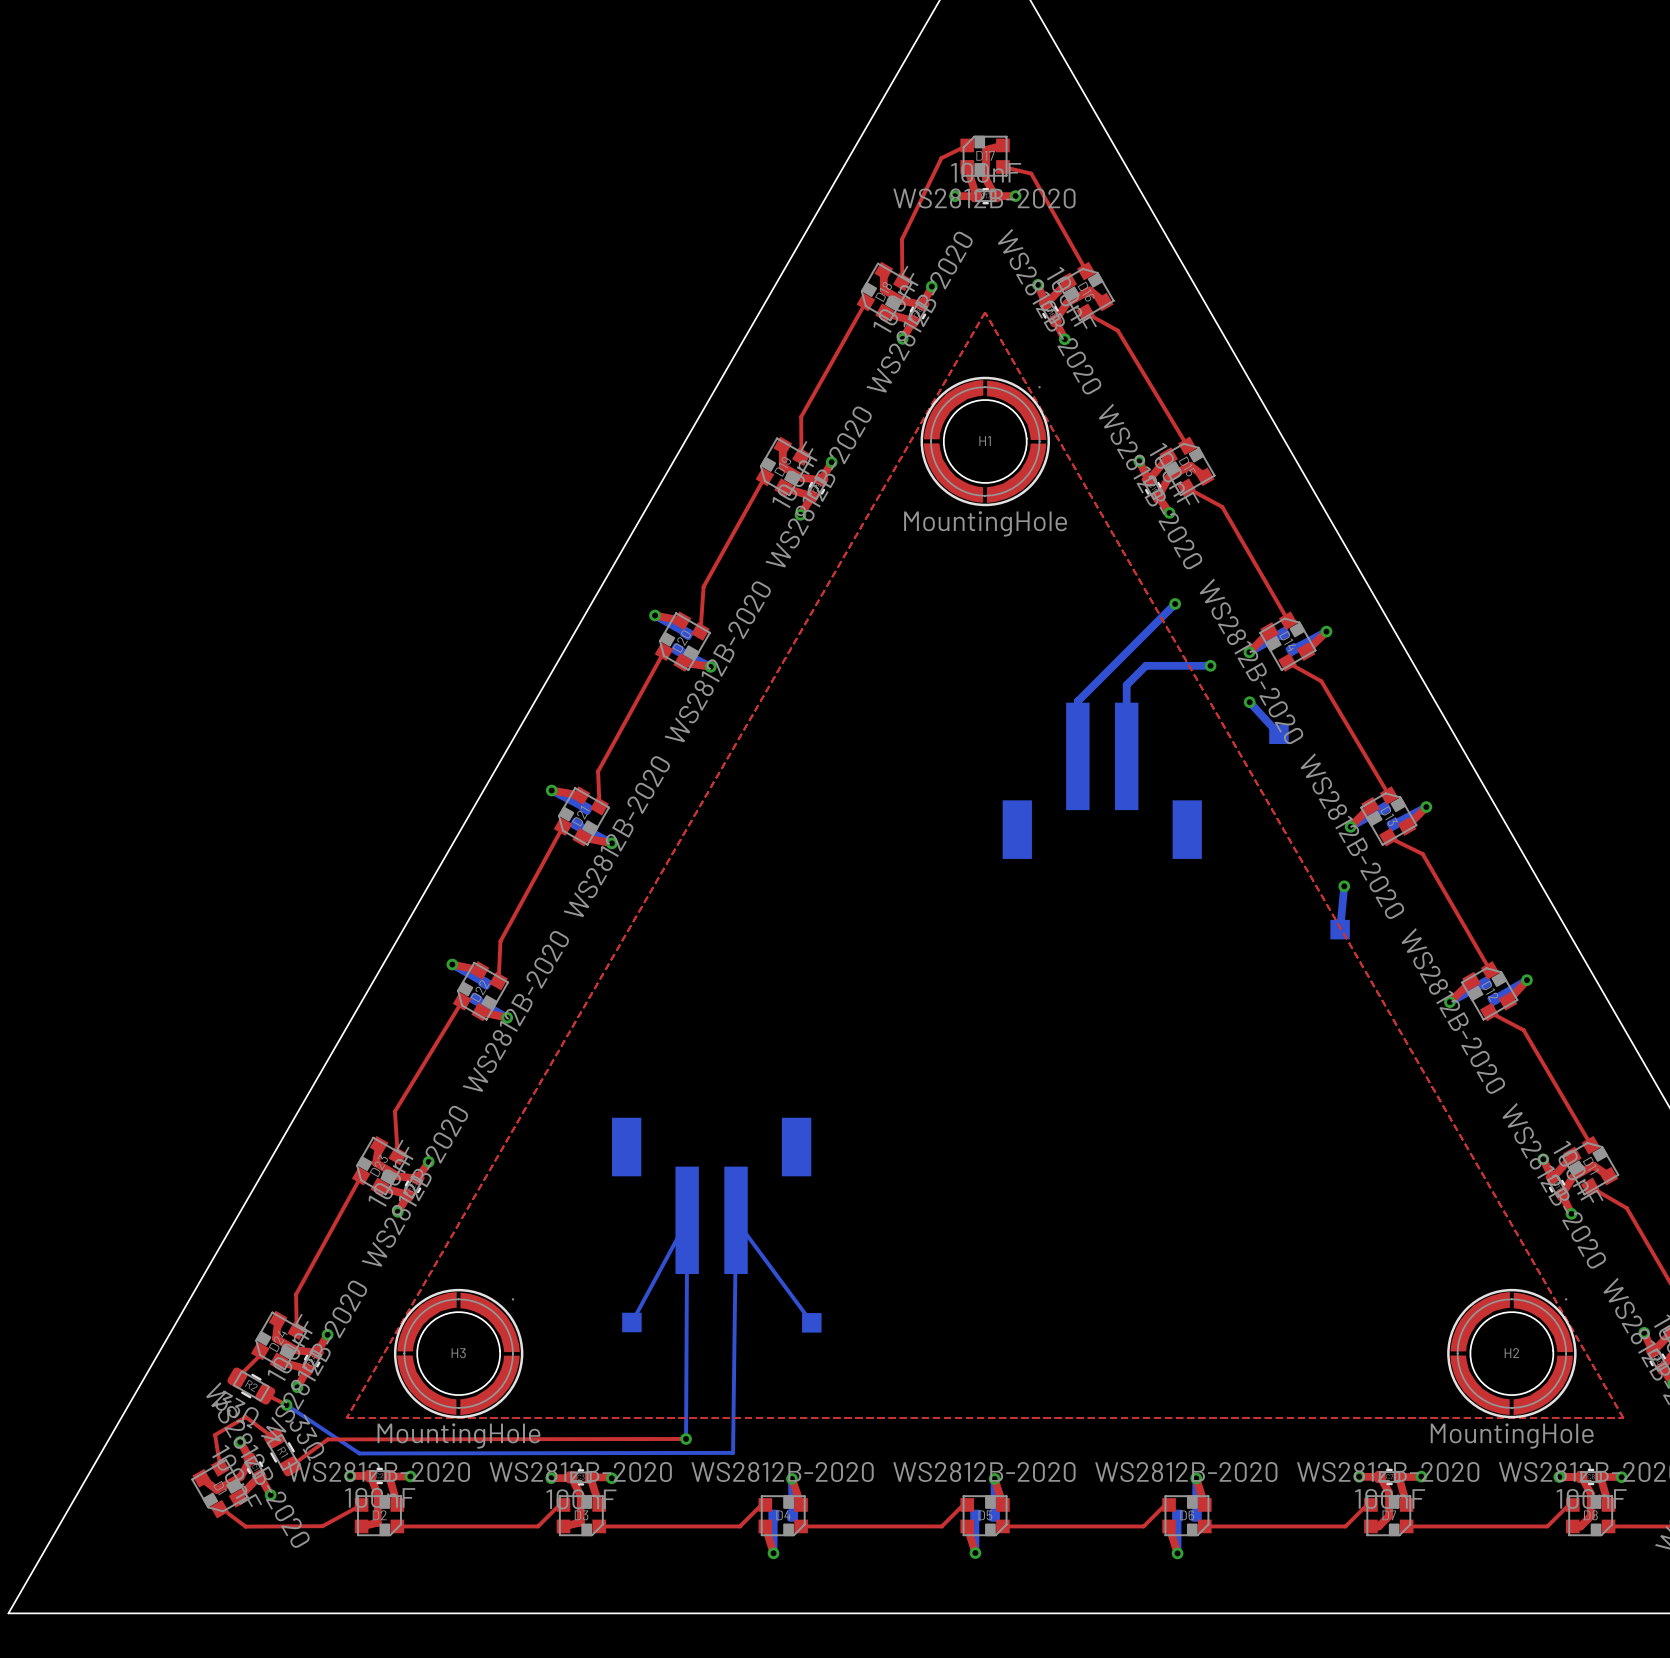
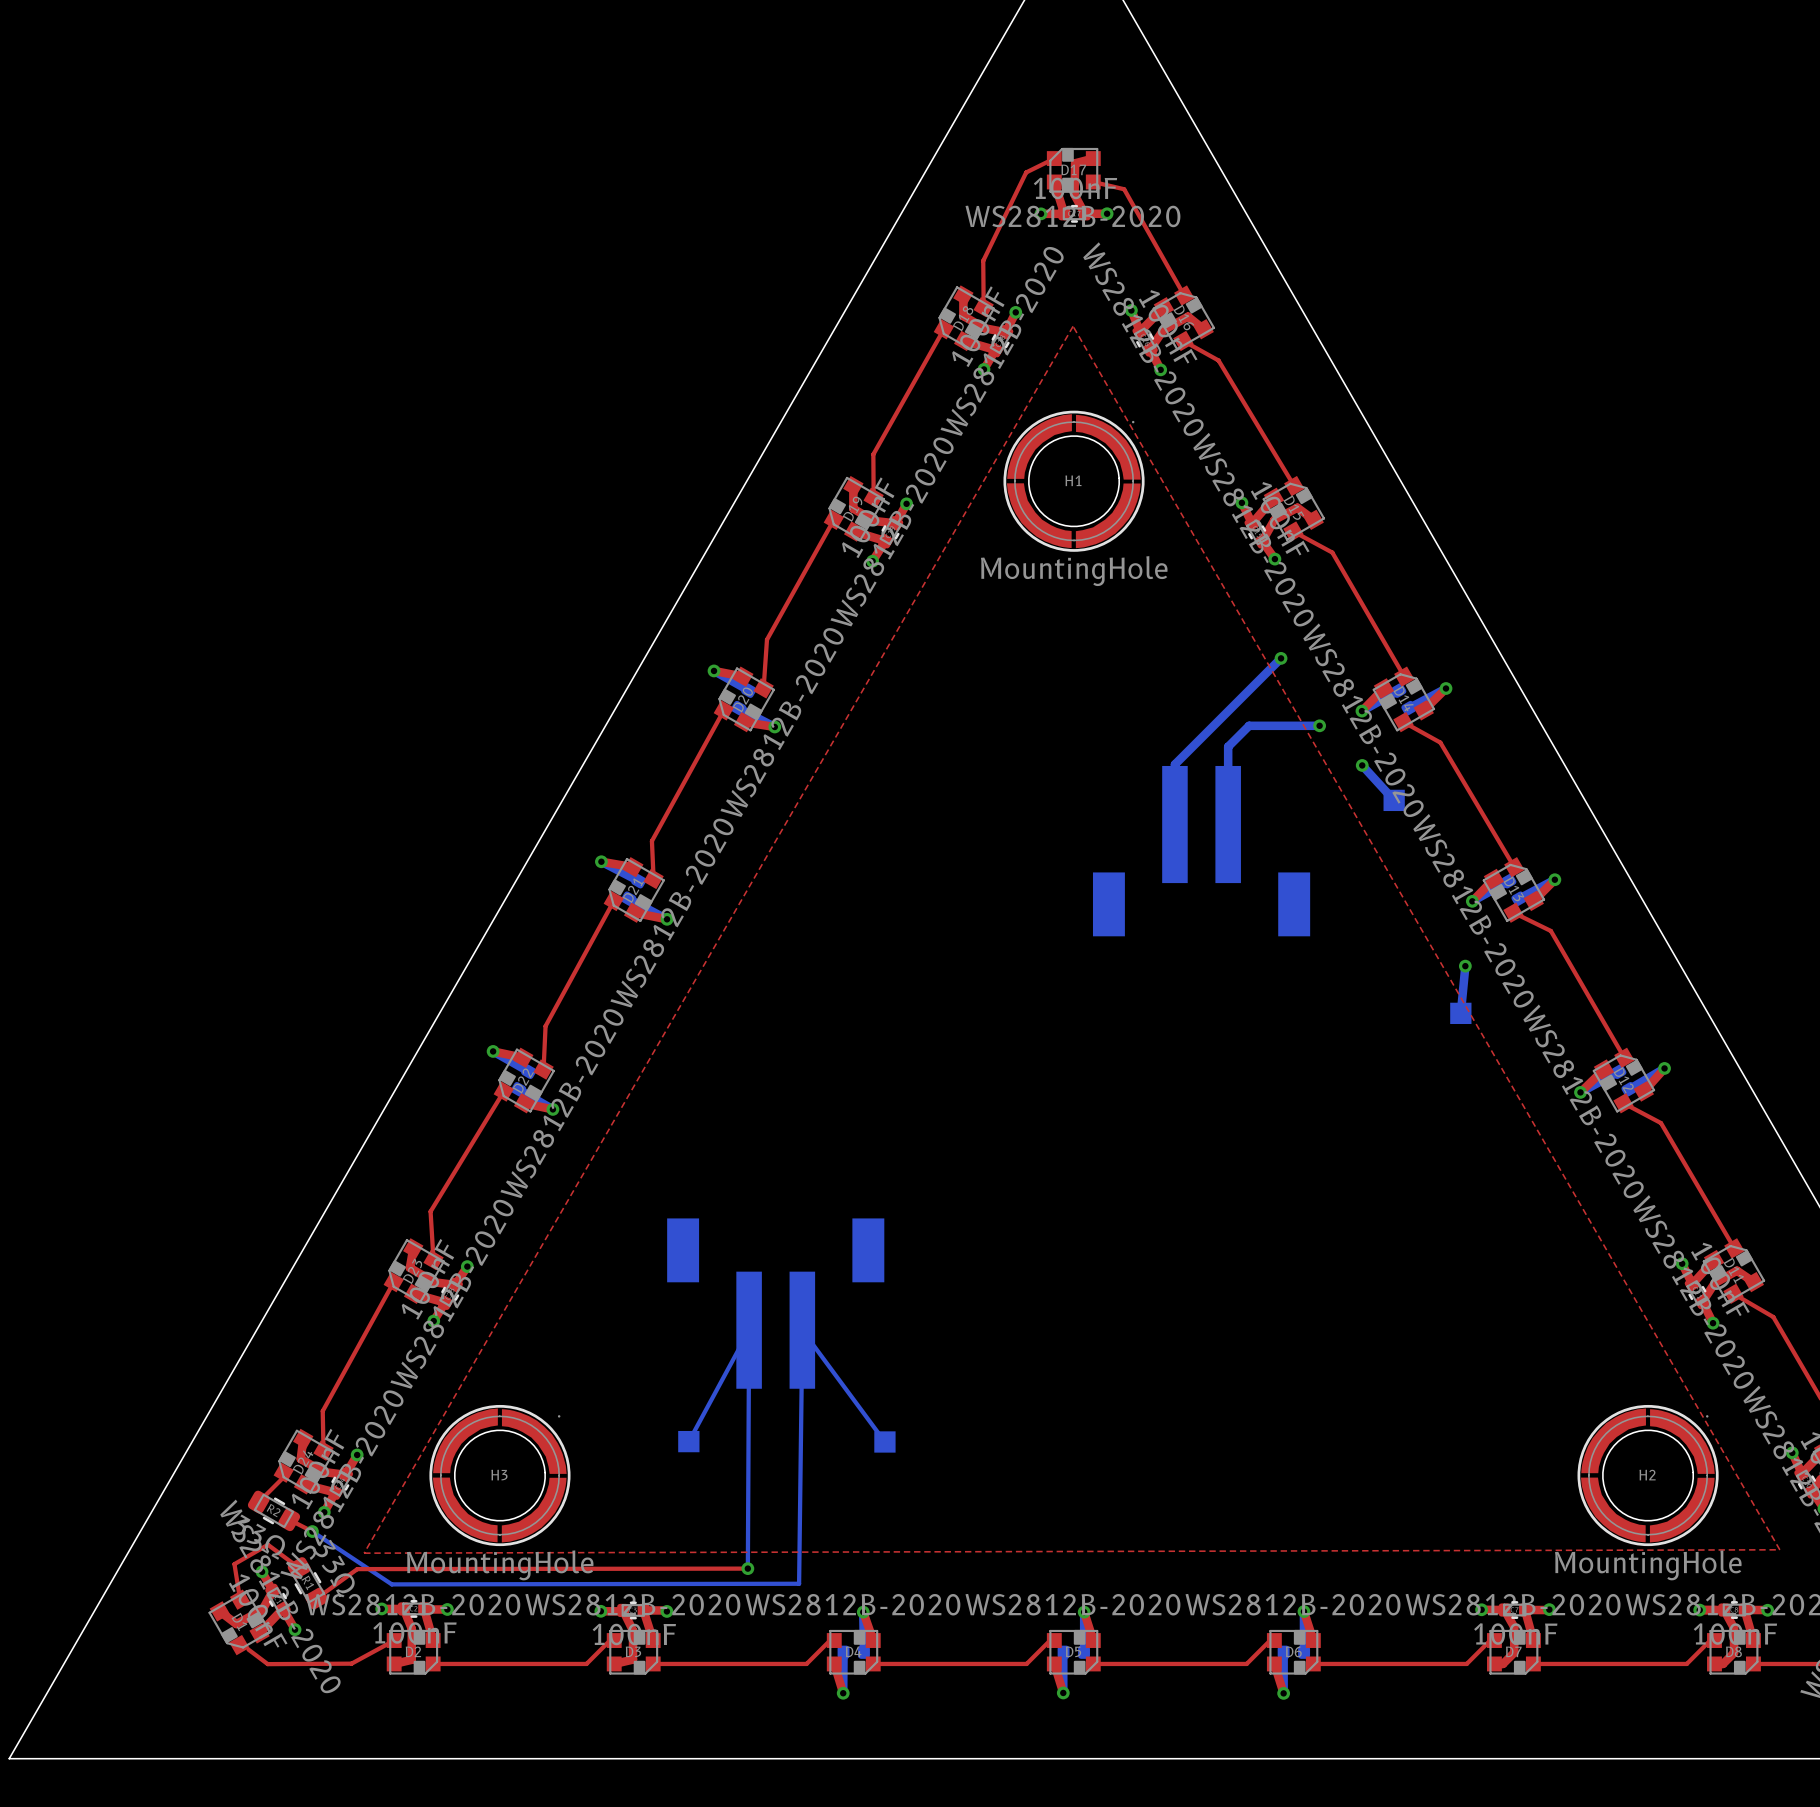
top zone outline: (985, 312) (1623, 1418) (346, 1418) (985, 312) -> (1073, 326) (364, 1553) (1779, 1549) (1073, 326)

